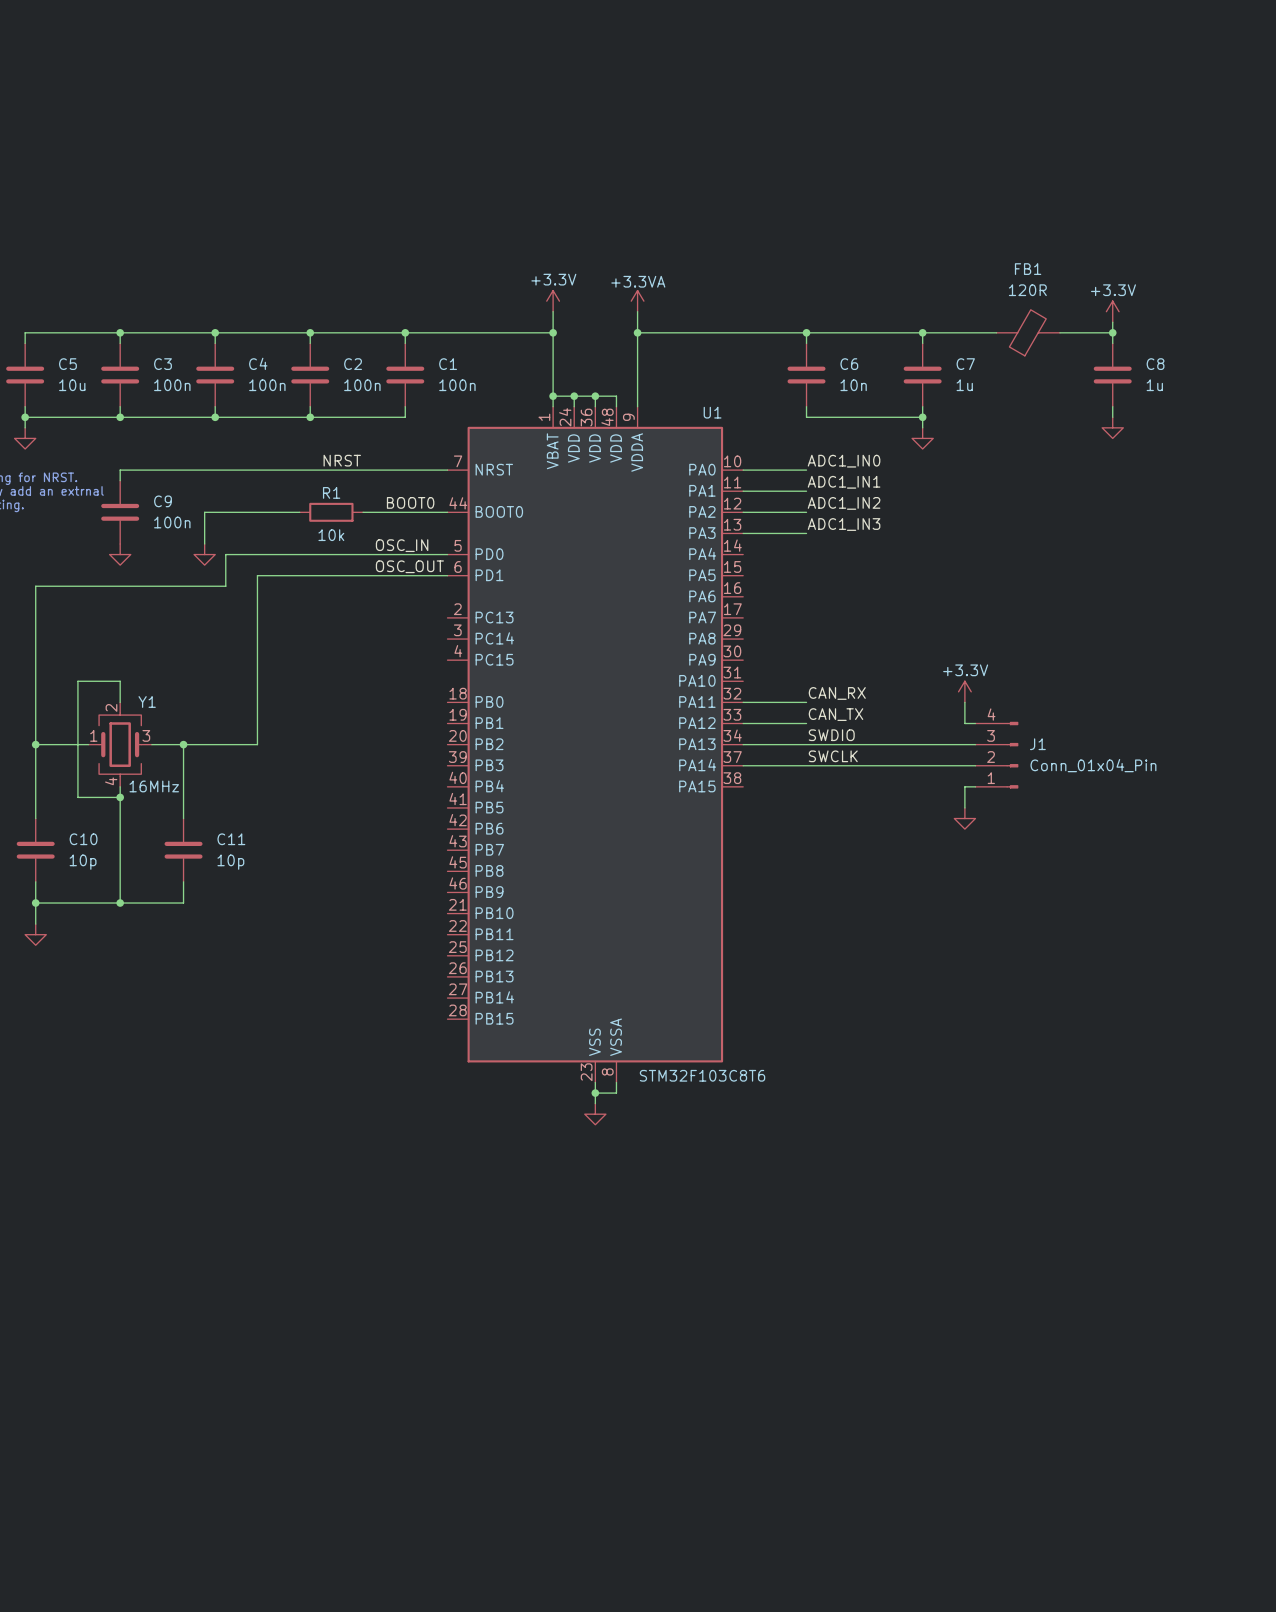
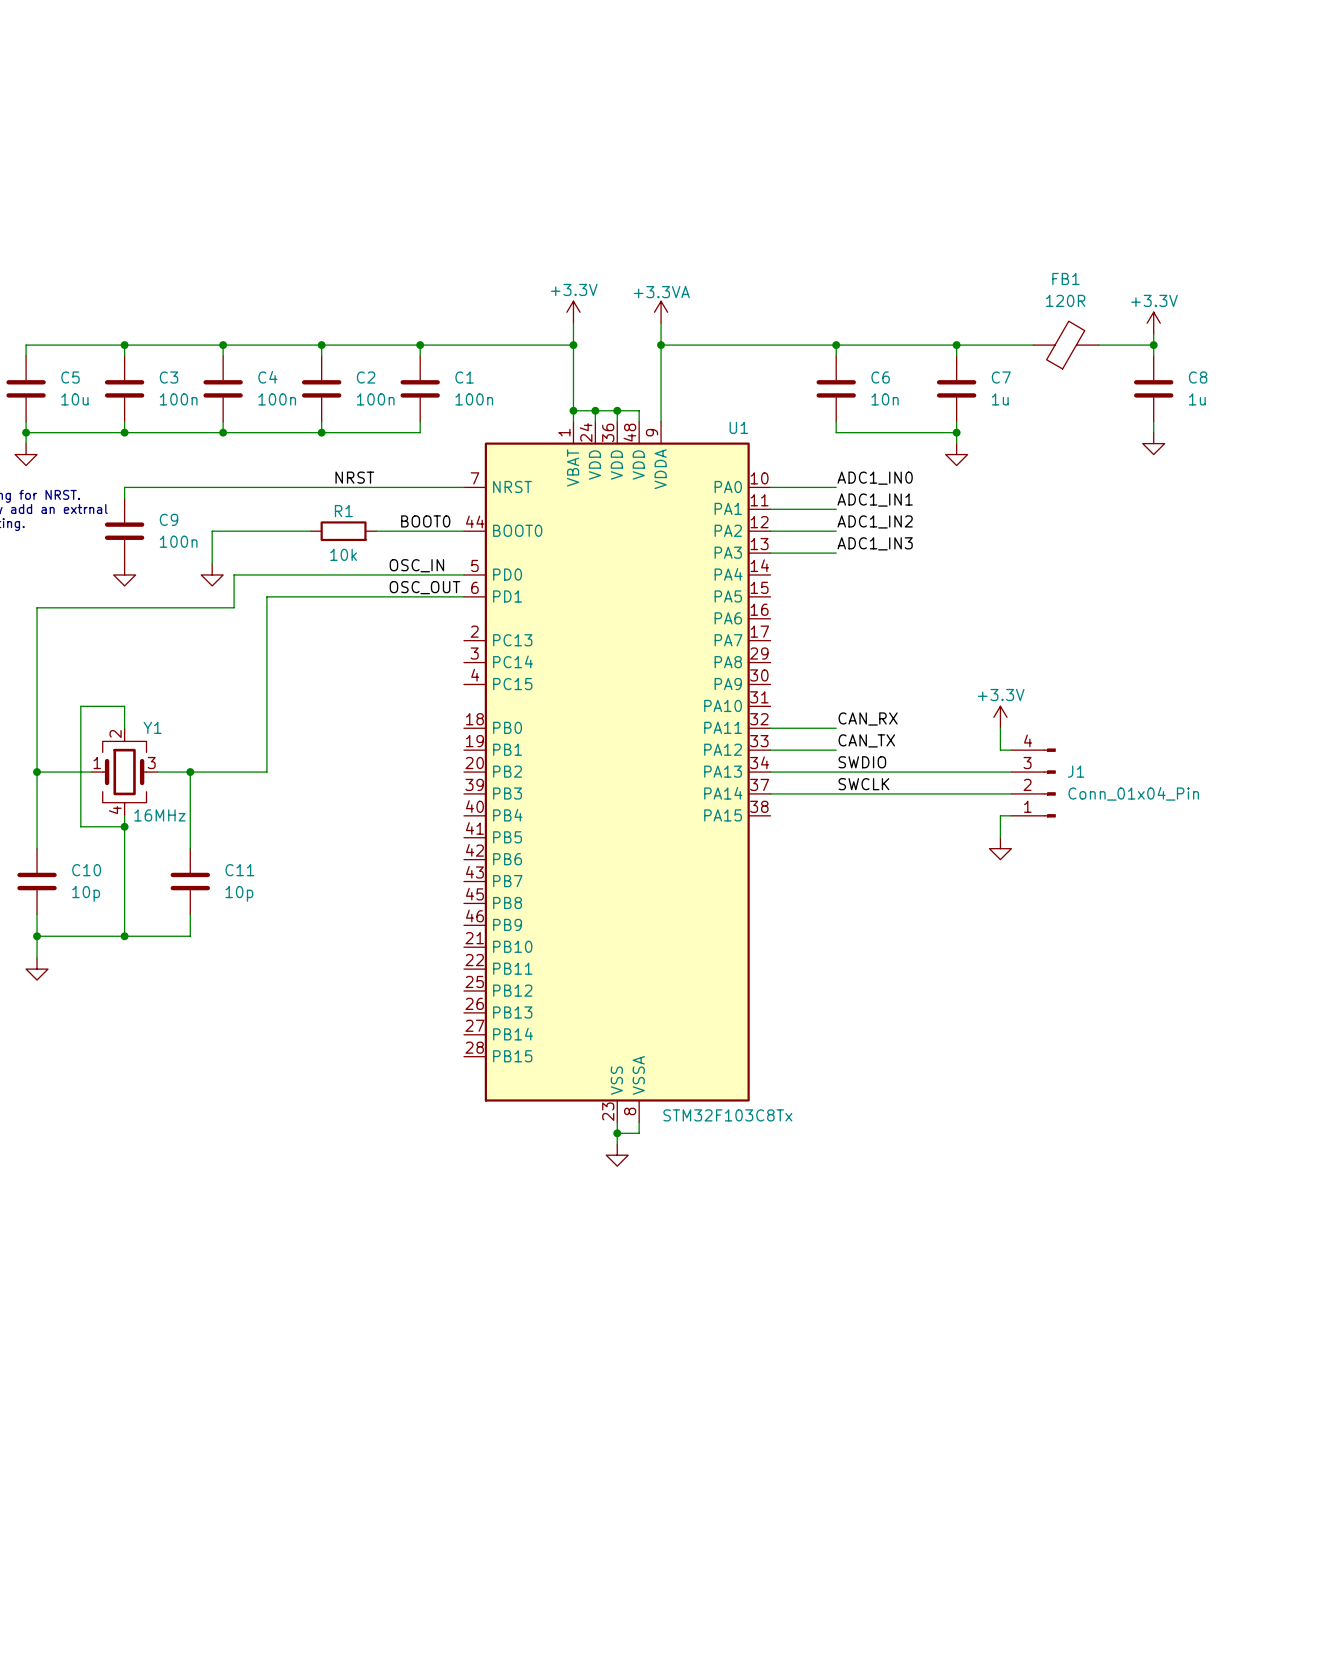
U1 value: STM32F103C8T6 (702, 1075) -> STM32F103C8Tx (727, 1115)

